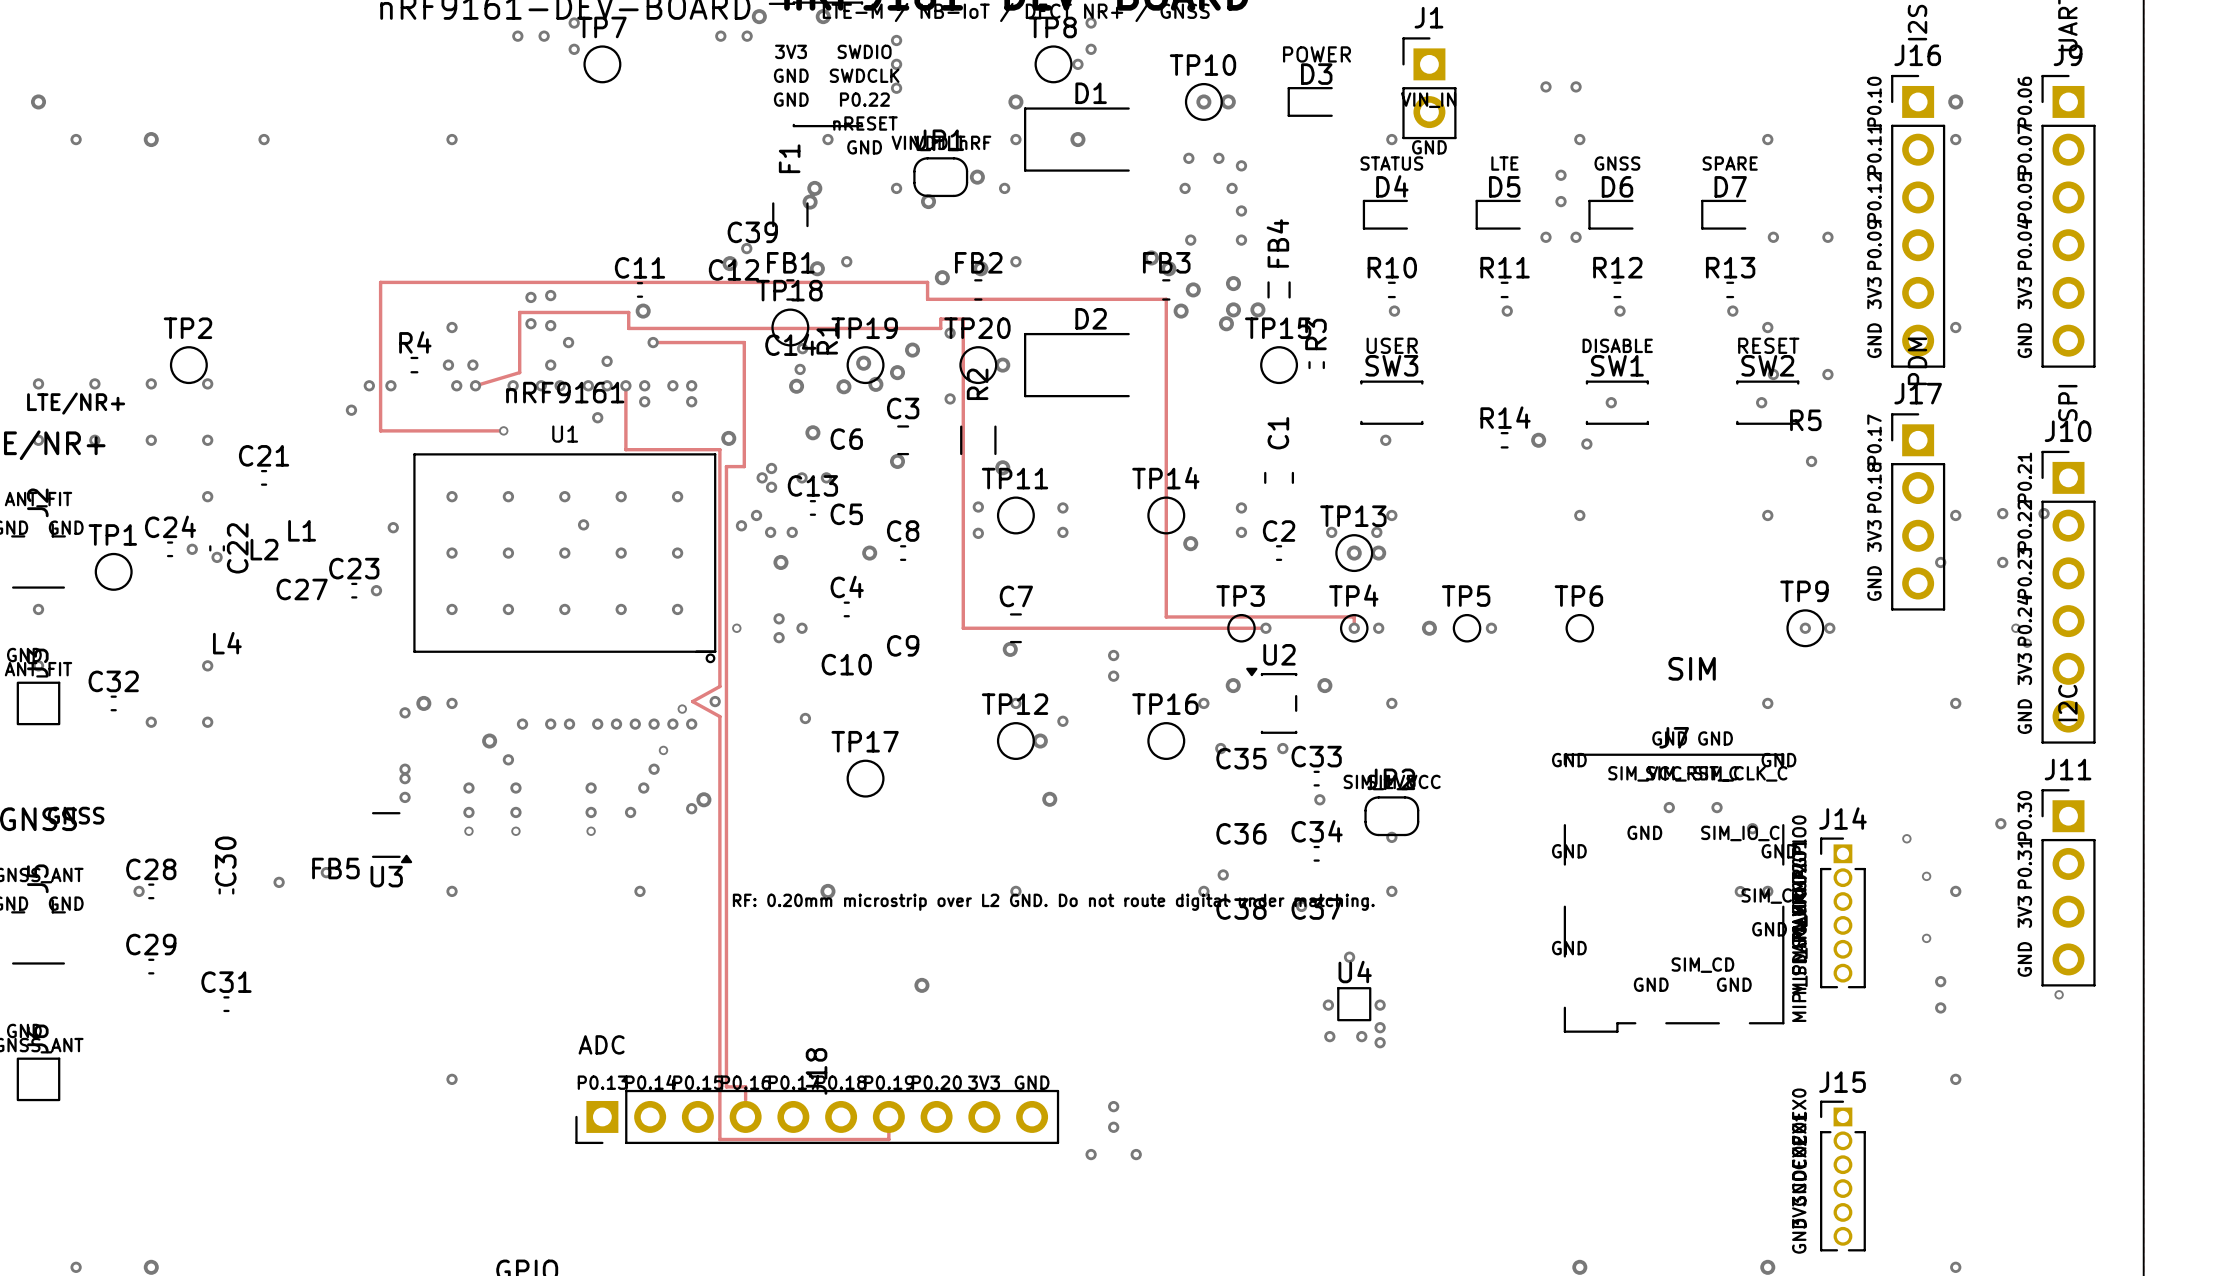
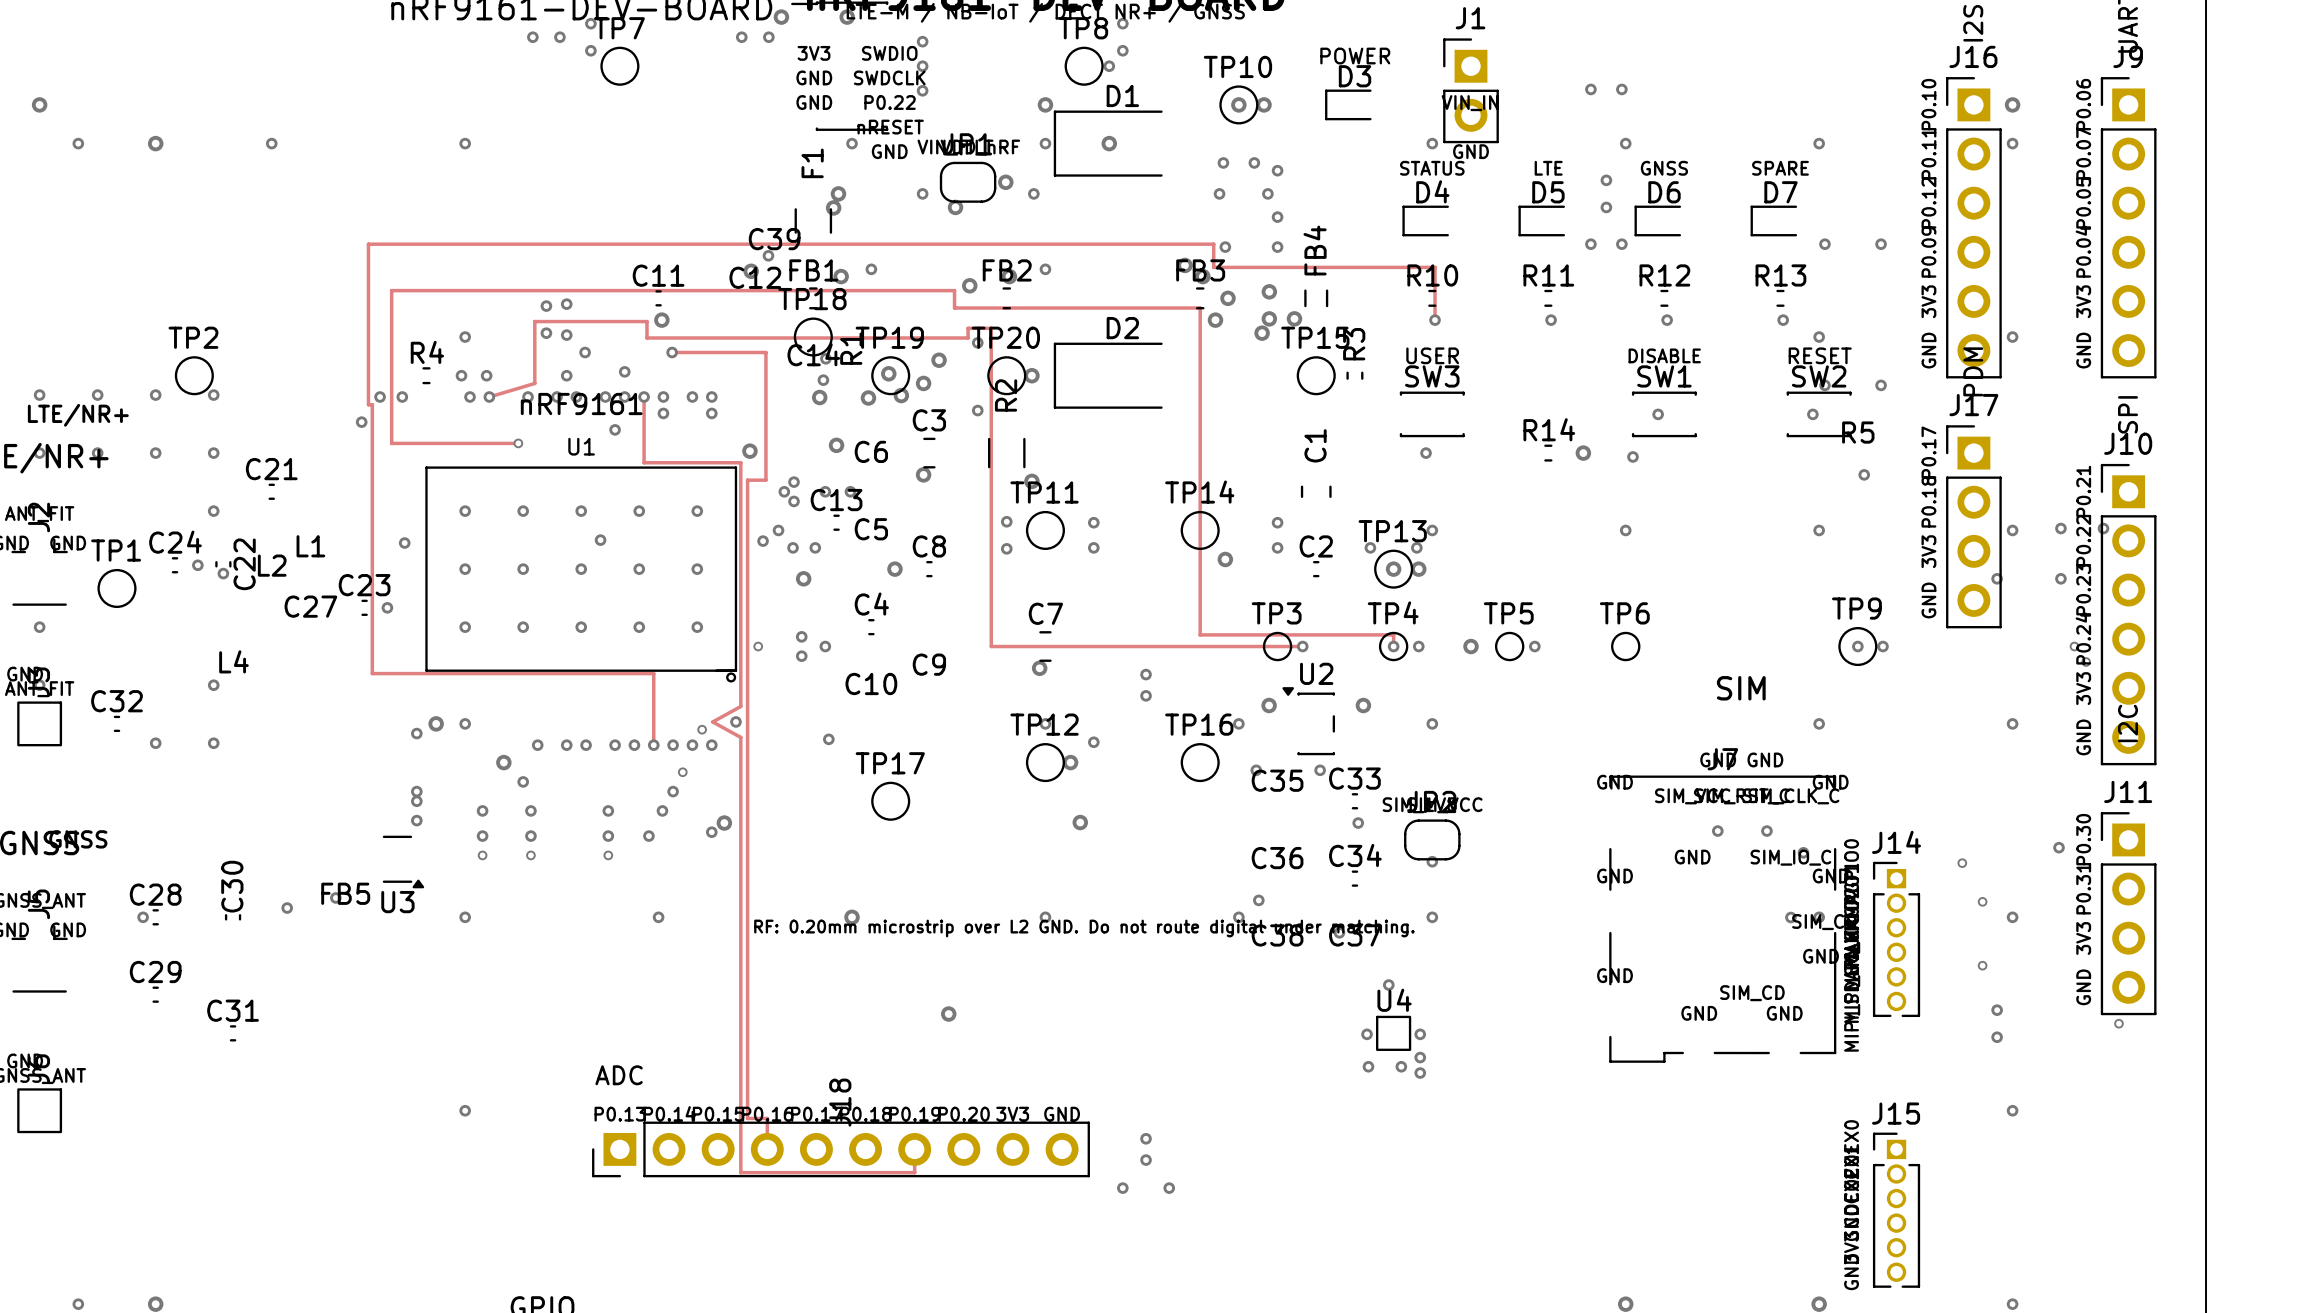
track: none -> (1435, 320) (1435, 267) (1213, 267) (1213, 244) (368, 244) (368, 404) (372, 404) (372, 673) (653, 673) (653, 745)

